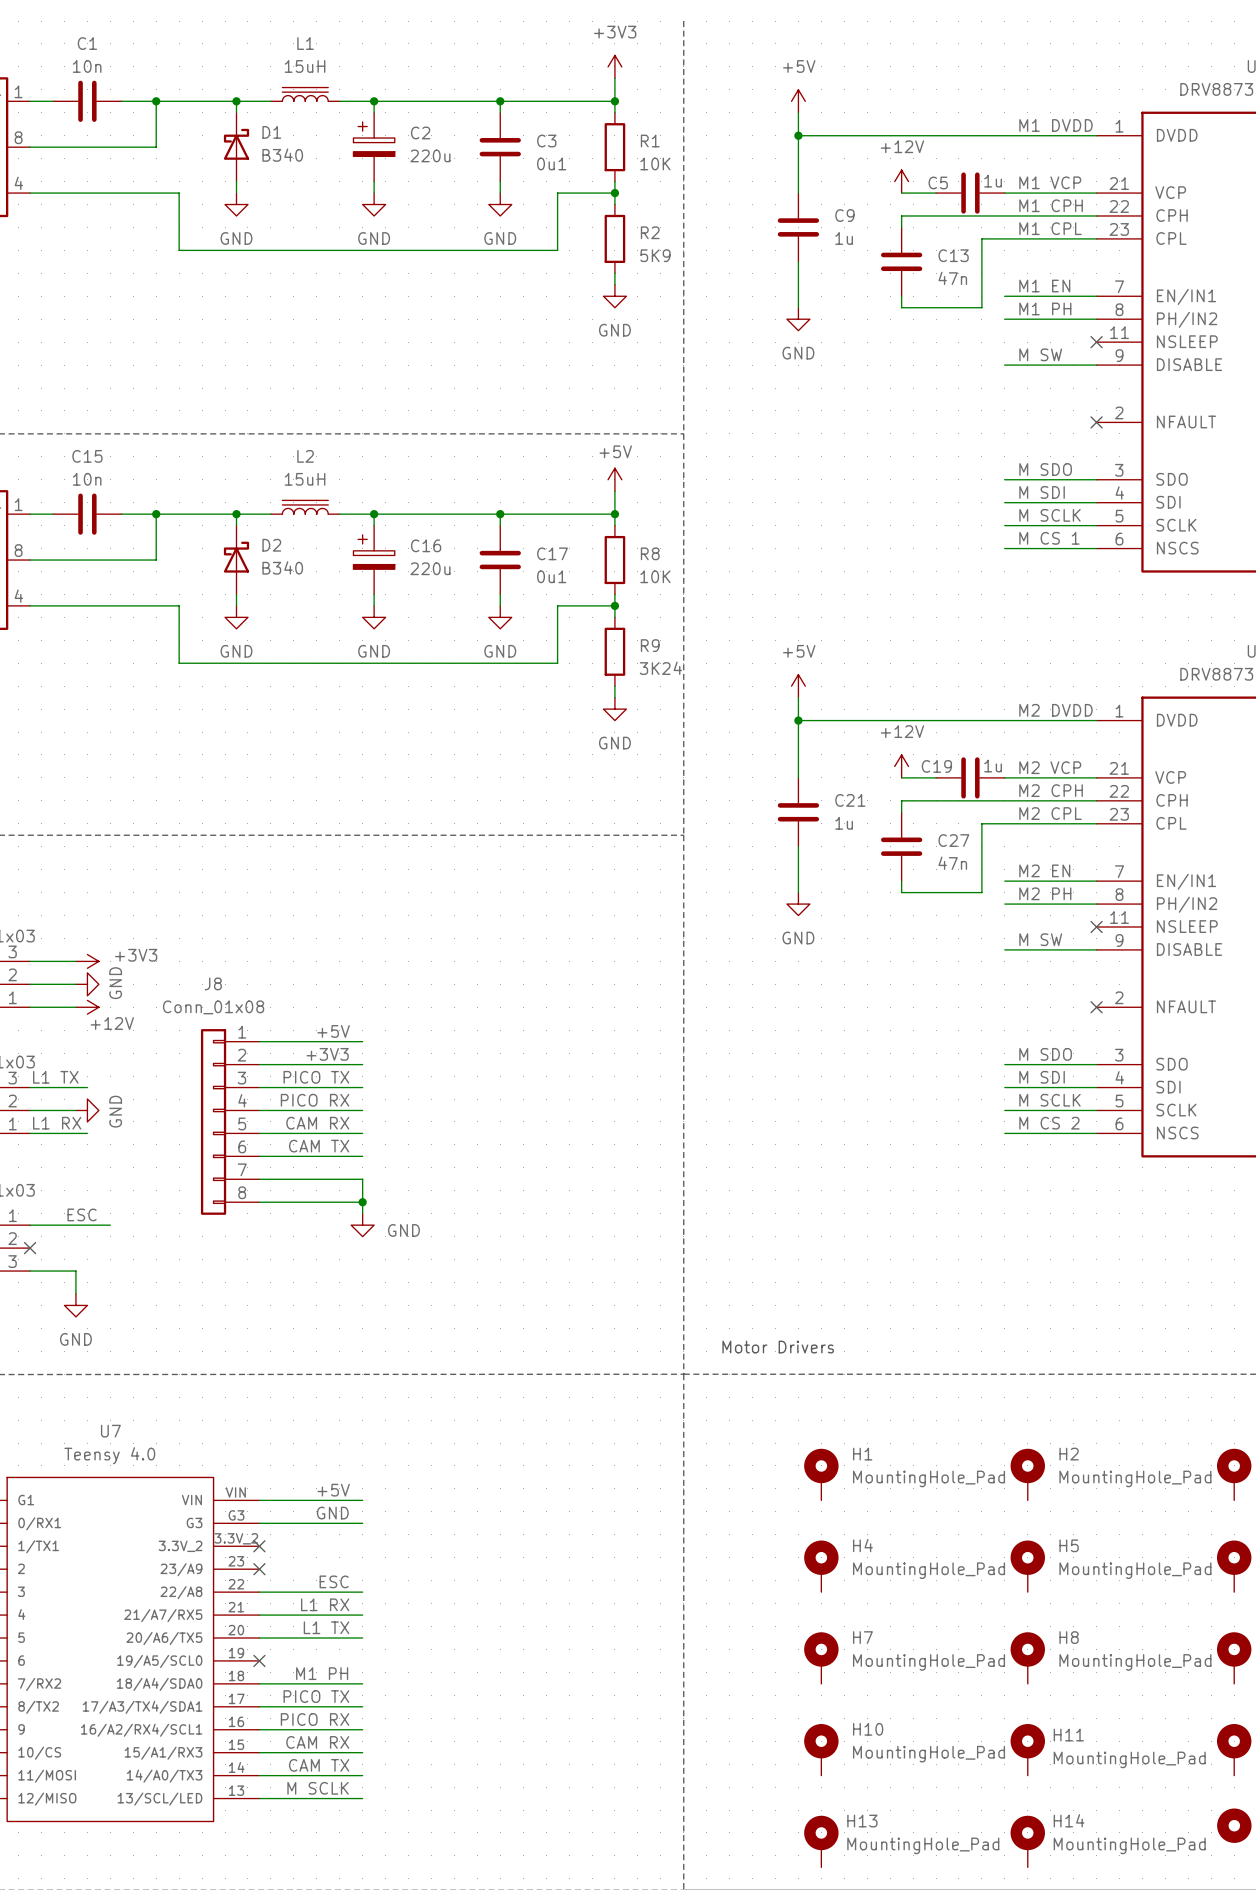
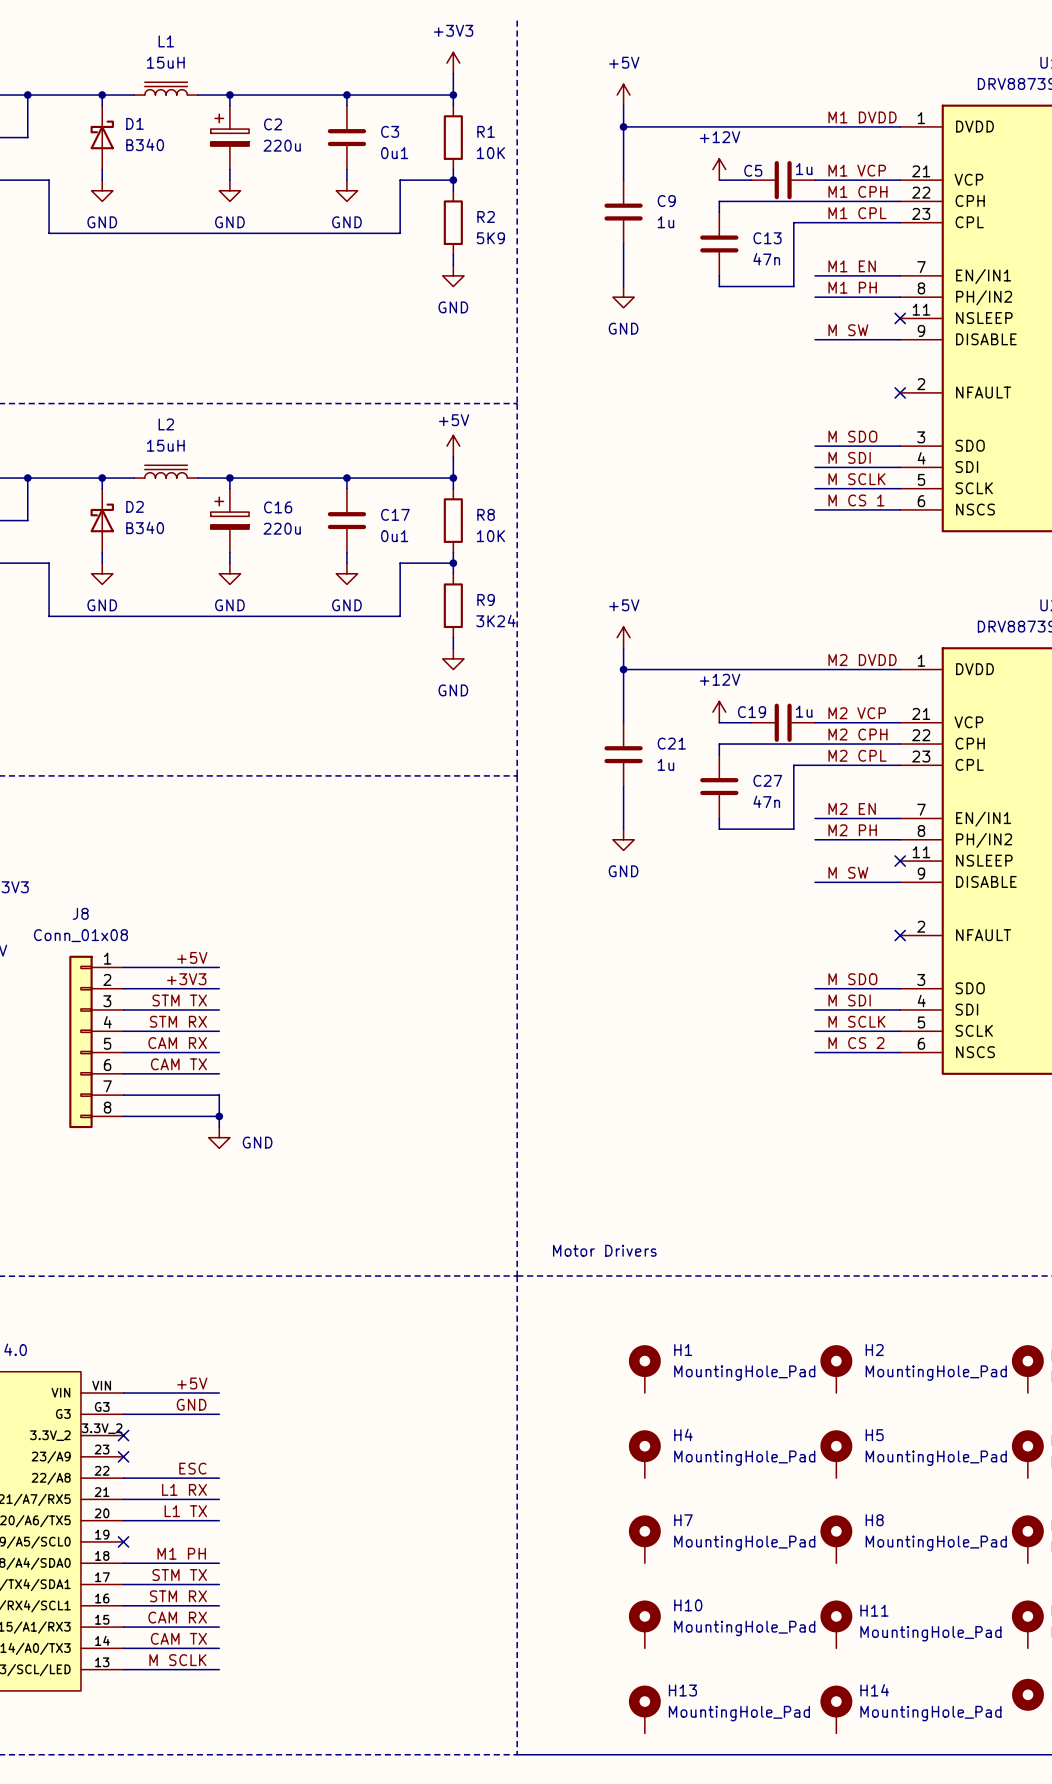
label: PICO TX (316, 1077) -> STM TX (179, 1000)
label: PICO RX (315, 1100) -> STM RX (178, 1021)
label: PICO TX (316, 1696) -> STM TX (179, 1575)
label: PICO RX (315, 1719) -> STM RX (178, 1596)

